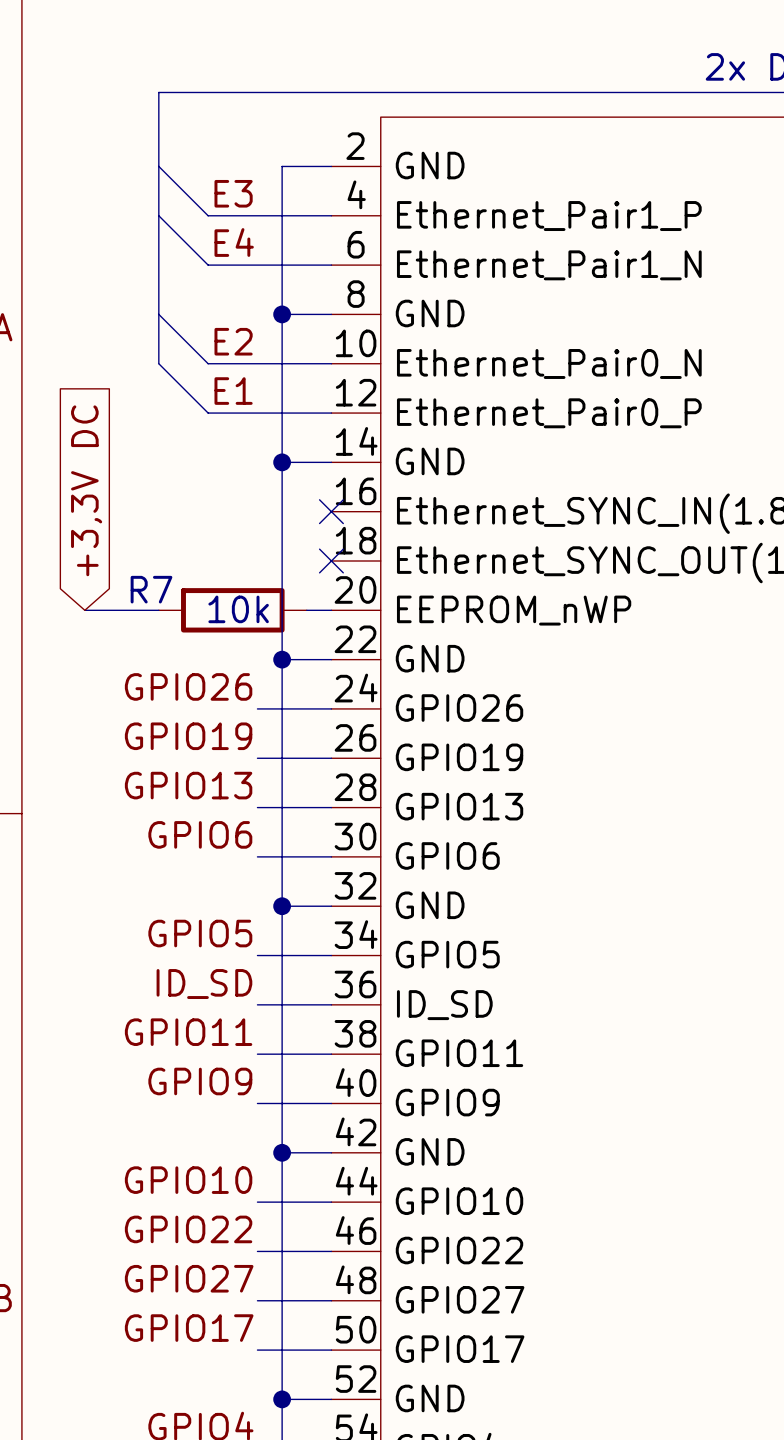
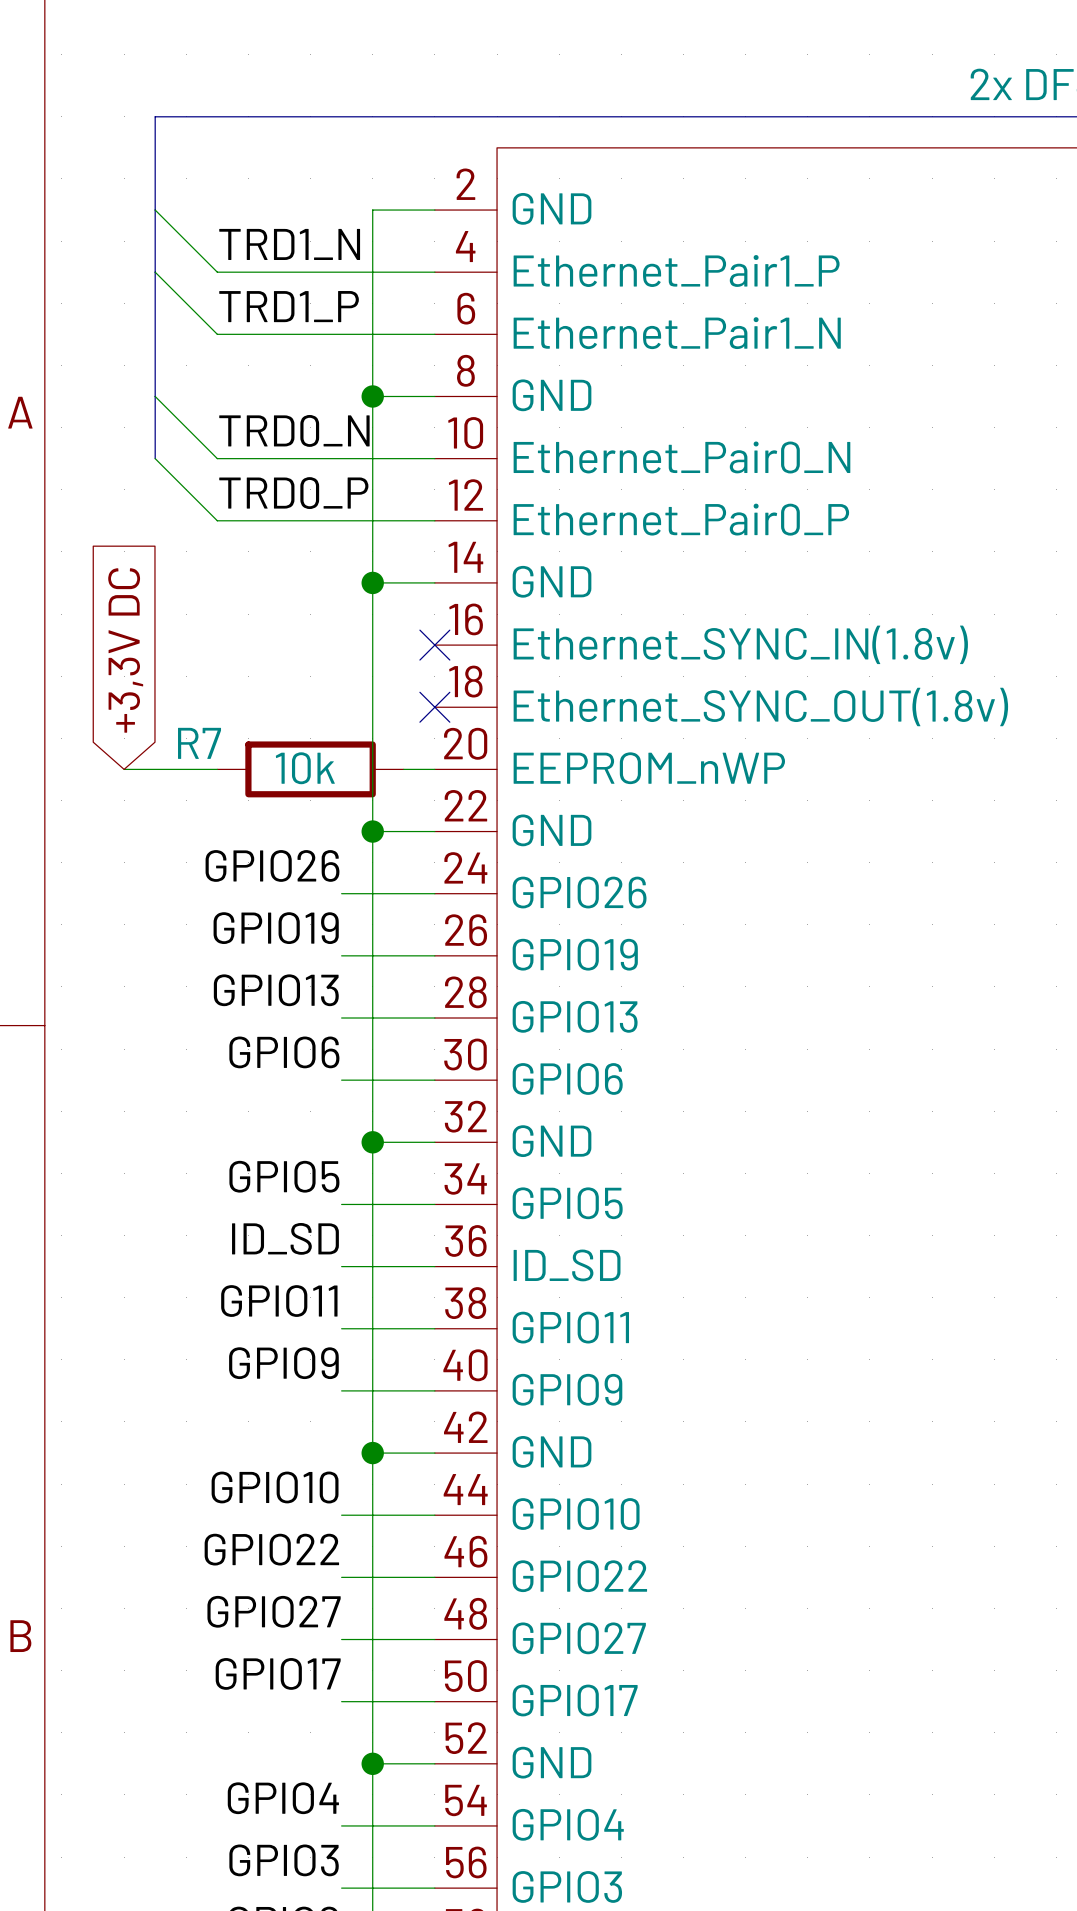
bus: (158, 92) (158, 363) -> (217, 116) (155, 116) (155, 458)
wire: (158, 166) (208, 215) -> (155, 210) (217, 272) (279, 272)
label: E3 (233, 193) -> none
label: none -> TRD1_N (289, 244)
wire: (158, 215) (208, 265) -> (155, 272) (217, 334) (279, 334)
label: E4 (234, 242) -> none
label: none -> TRD1_P (289, 306)
wire: (158, 314) (208, 363) -> (155, 396) (217, 458) (279, 458)
label: E2 (233, 341) -> none
label: none -> TRD0_N (294, 430)
wire: (158, 363) (208, 413) -> (155, 458) (217, 520) (279, 520)
label: E1 (233, 391) -> none
label: none -> TRD0_P (293, 493)

